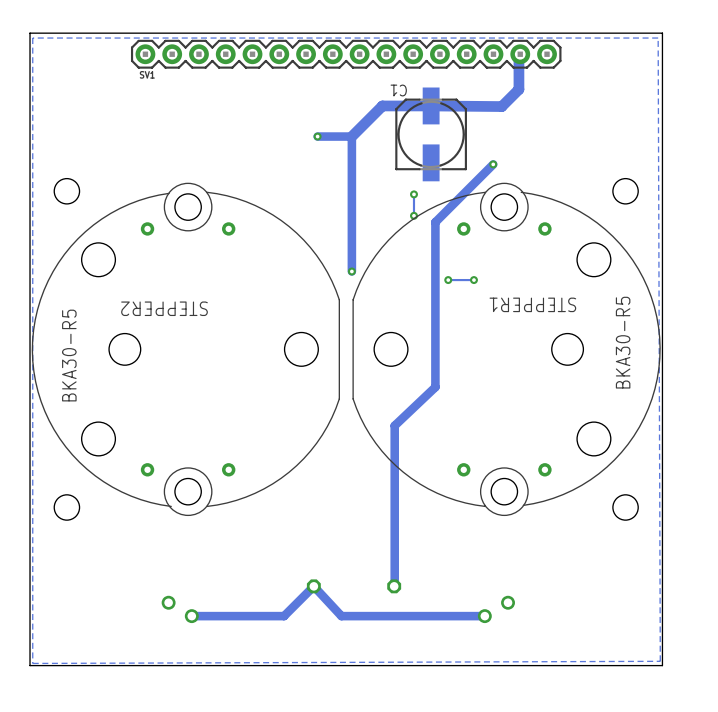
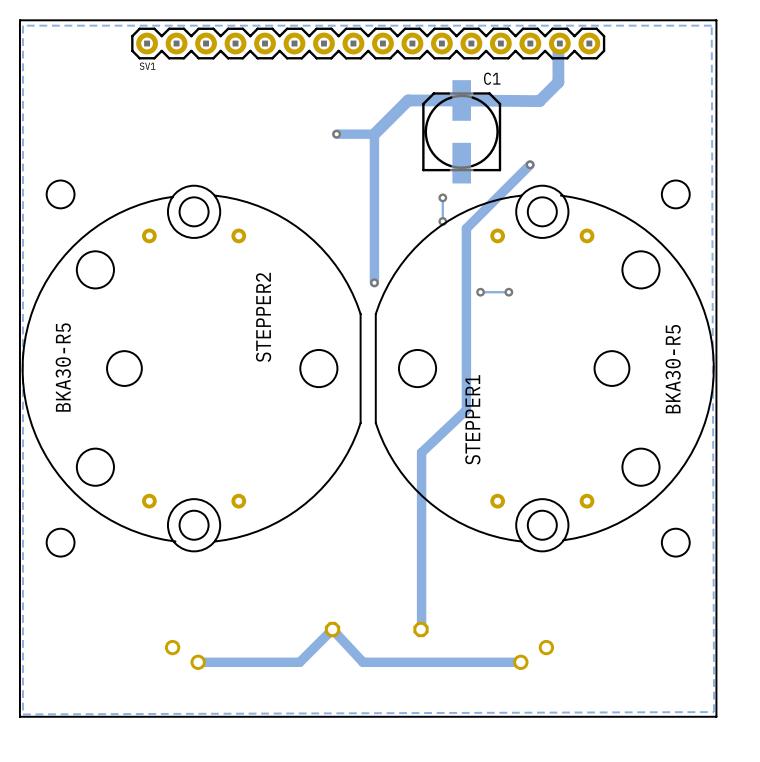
C1 name rotation: 0° (398, 90) -> 180° (492, 78)
C1 name position: C1 (398, 90) -> C1 (492, 78)
STEPPER1 name rotation: 0° (532, 304) -> 90° clockwise (472, 419)
STEPPER1 name position: STEPPER1 (532, 304) -> STEPPER1 (472, 419)
STEPPER2 name rotation: 0° (164, 308) -> 90° clockwise (263, 317)

